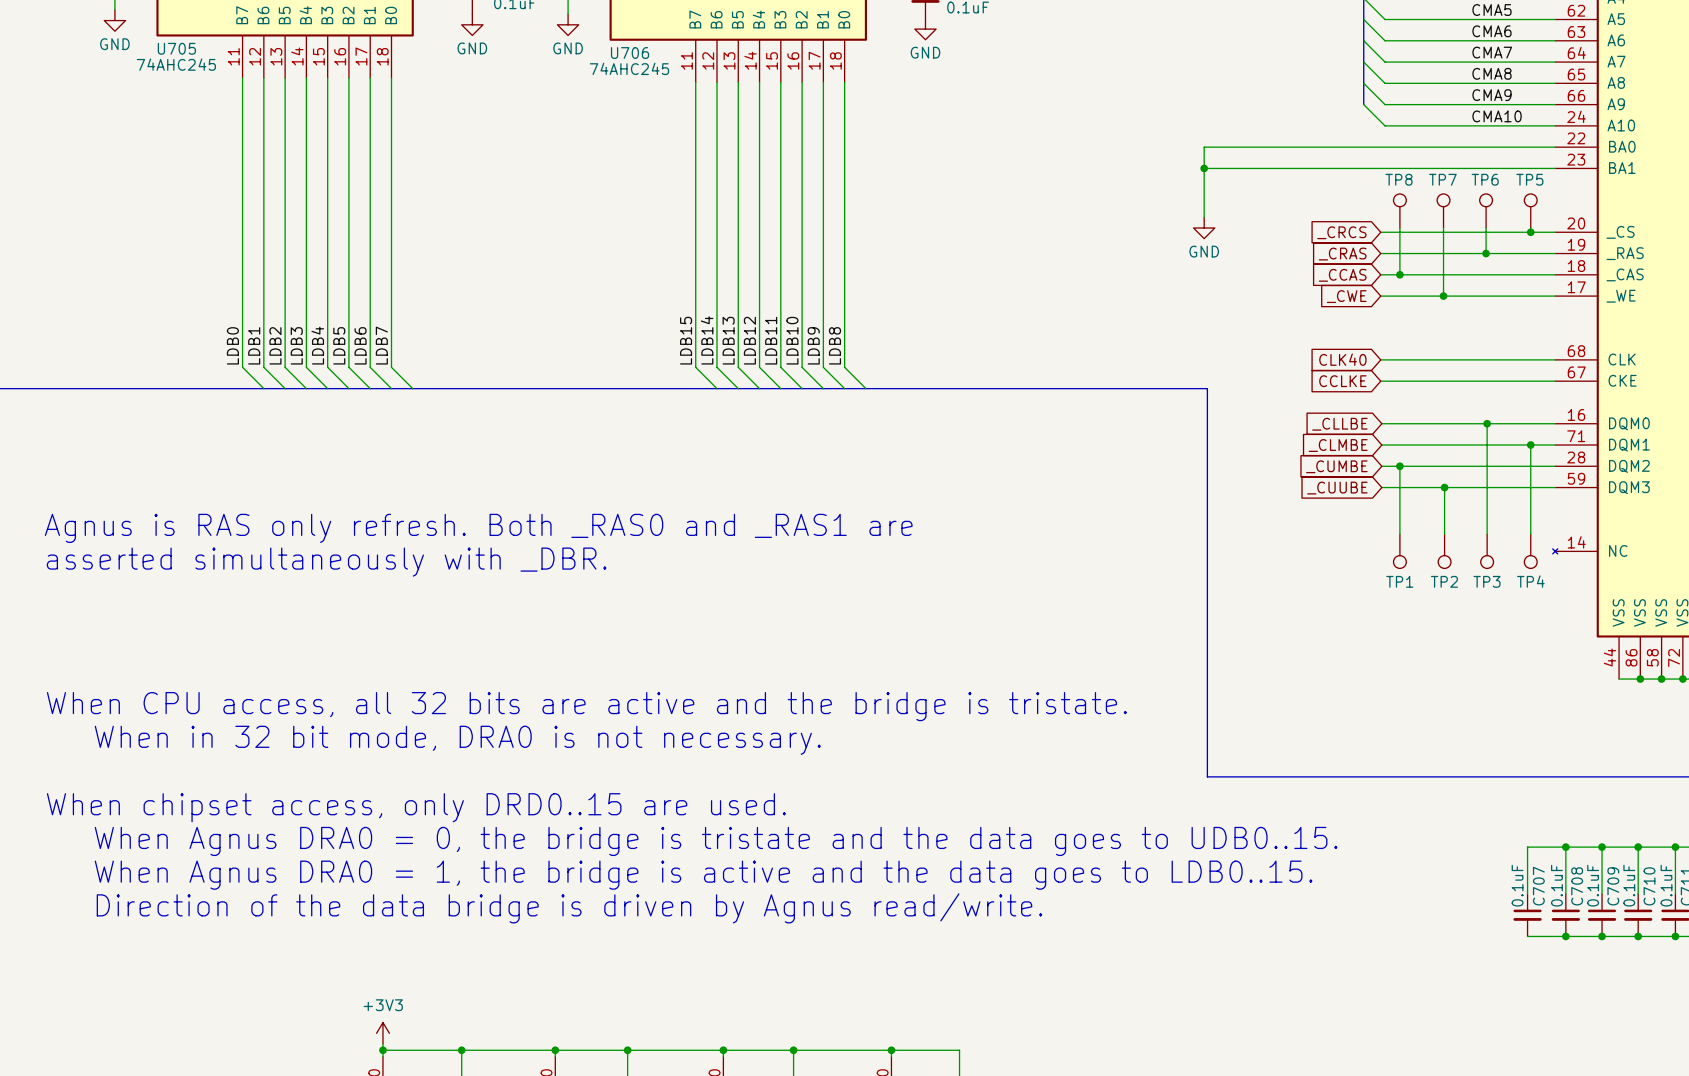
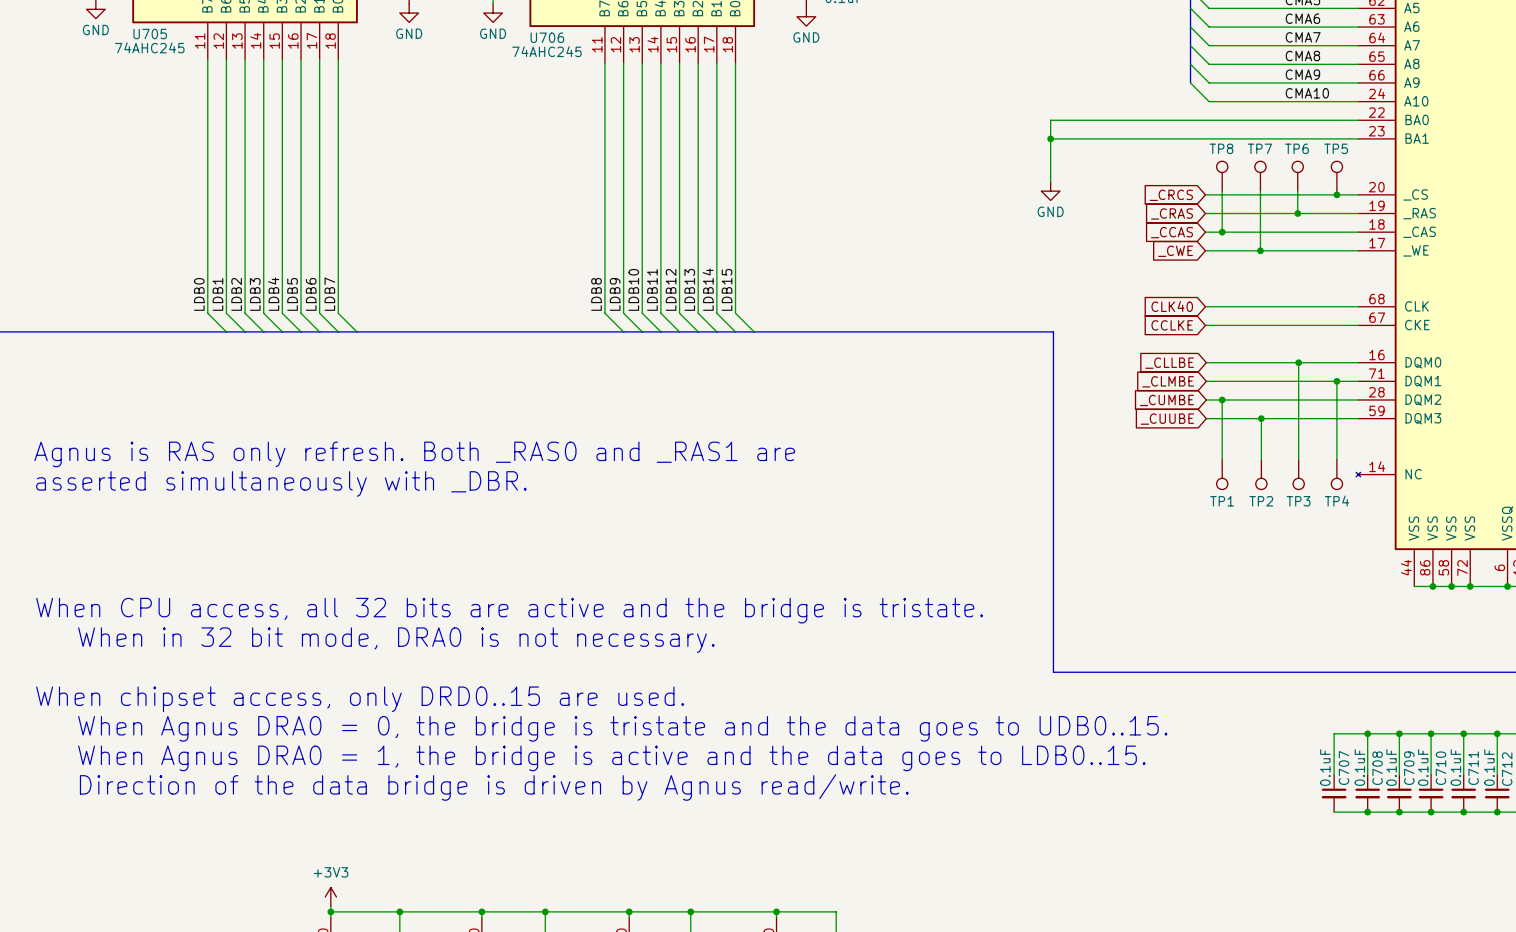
label: LDB15 (686, 340) -> LDB8 (596, 294)
label: LDB14 (707, 340) -> LDB9 (615, 294)
label: LDB13 (728, 340) -> LDB10 (633, 289)
label: LDB12 (749, 340) -> LDB11 (652, 289)
label: LDB11 (771, 340) -> LDB12 (671, 289)
label: LDB10 (792, 340) -> LDB13 (689, 289)
label: LDB9 (813, 345) -> LDB14 (708, 289)
label: LDB8 (834, 345) -> LDB15 (727, 289)

